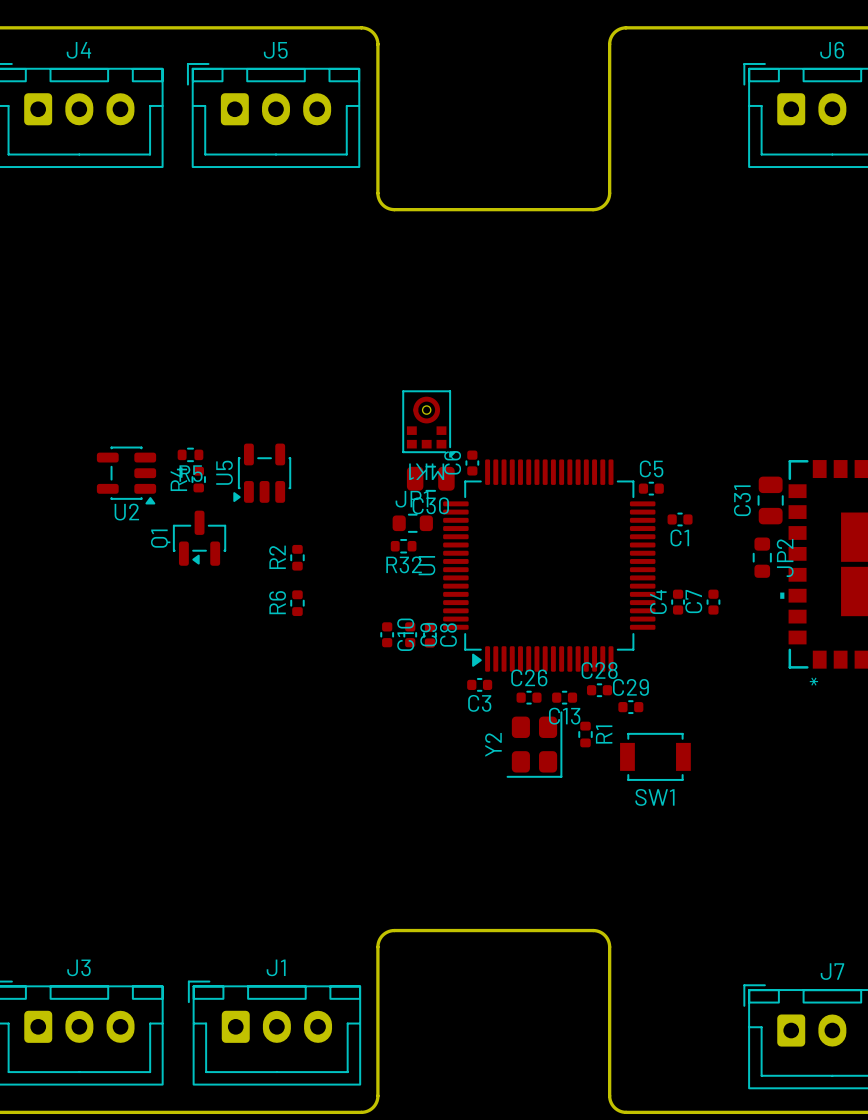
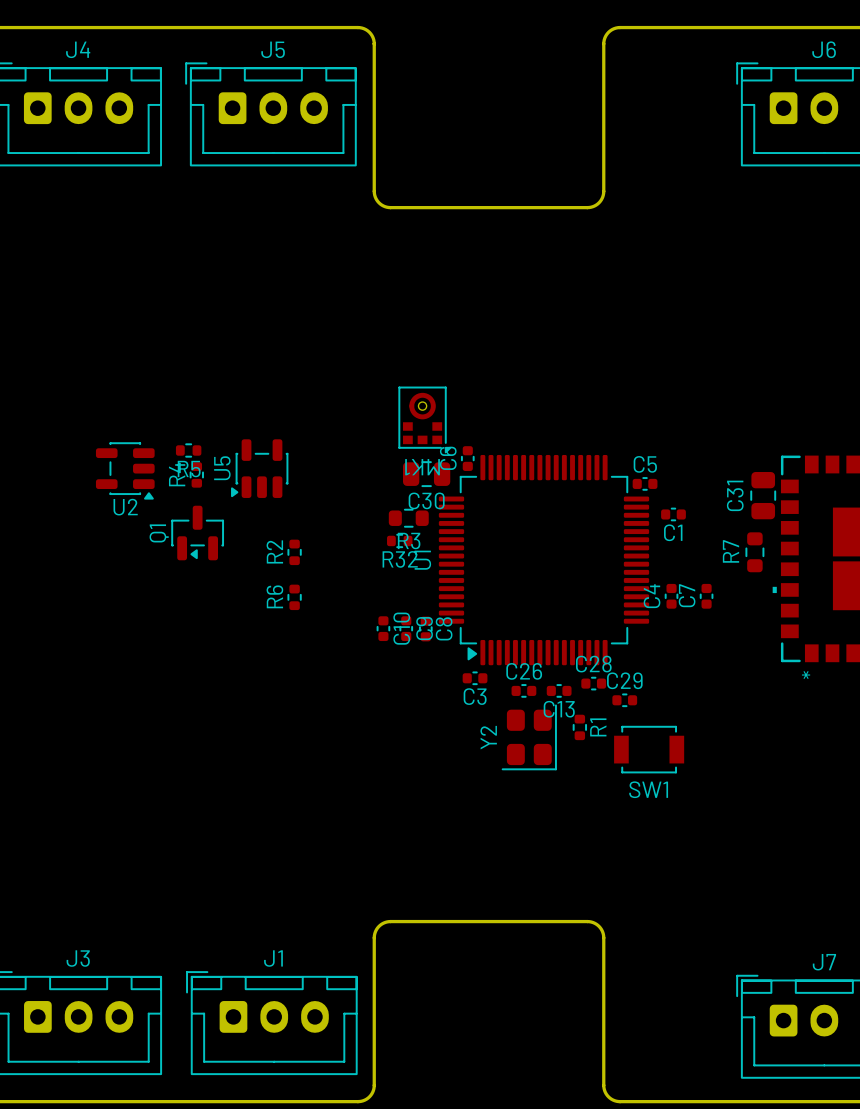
JP1 name: JP1 (412, 499) -> R3 (409, 541)
JP2 name: JP2 (785, 558) -> R7 (730, 551)

